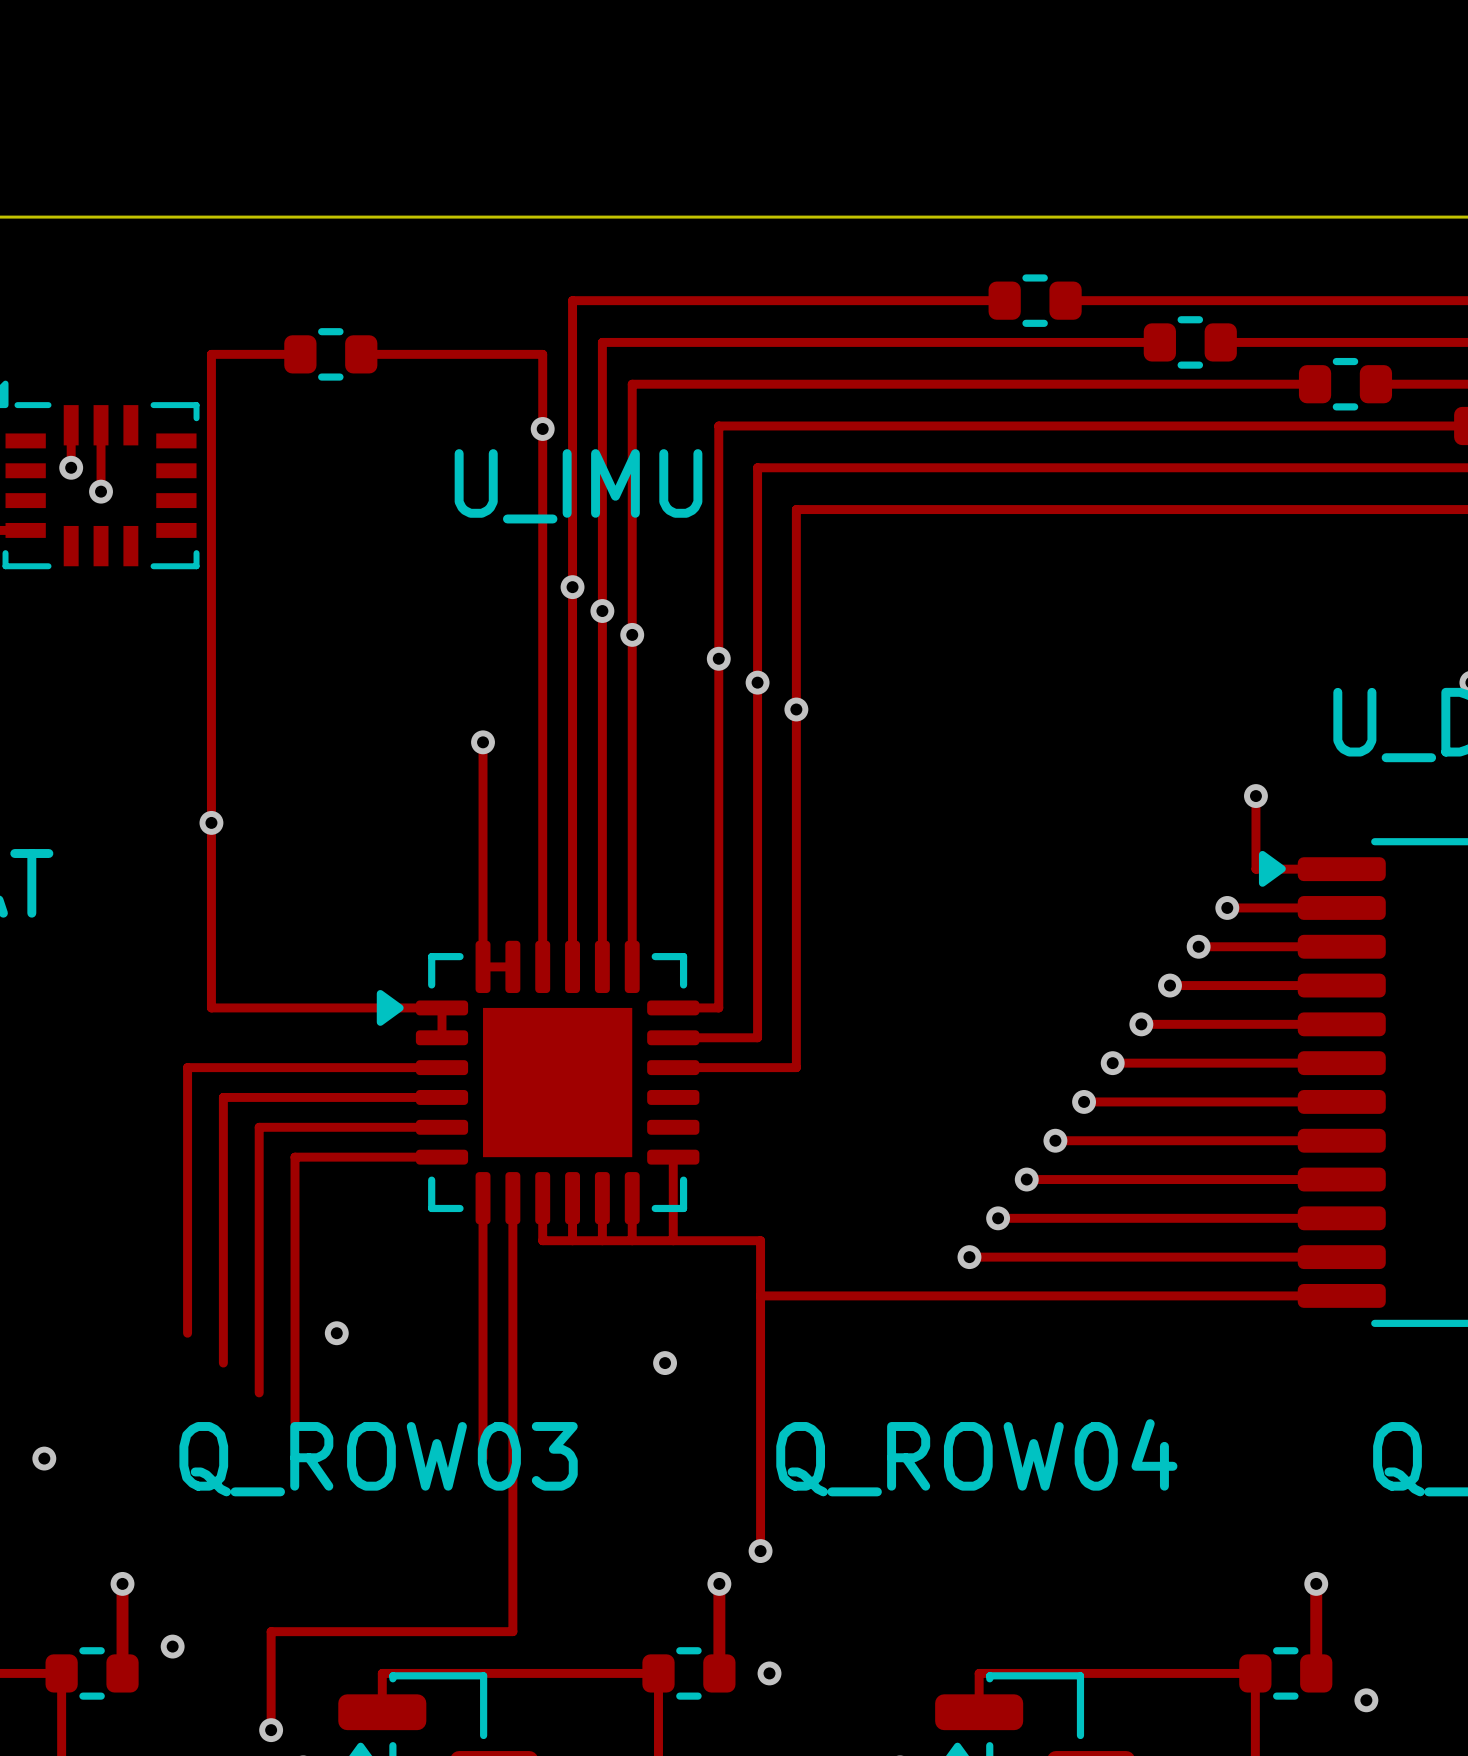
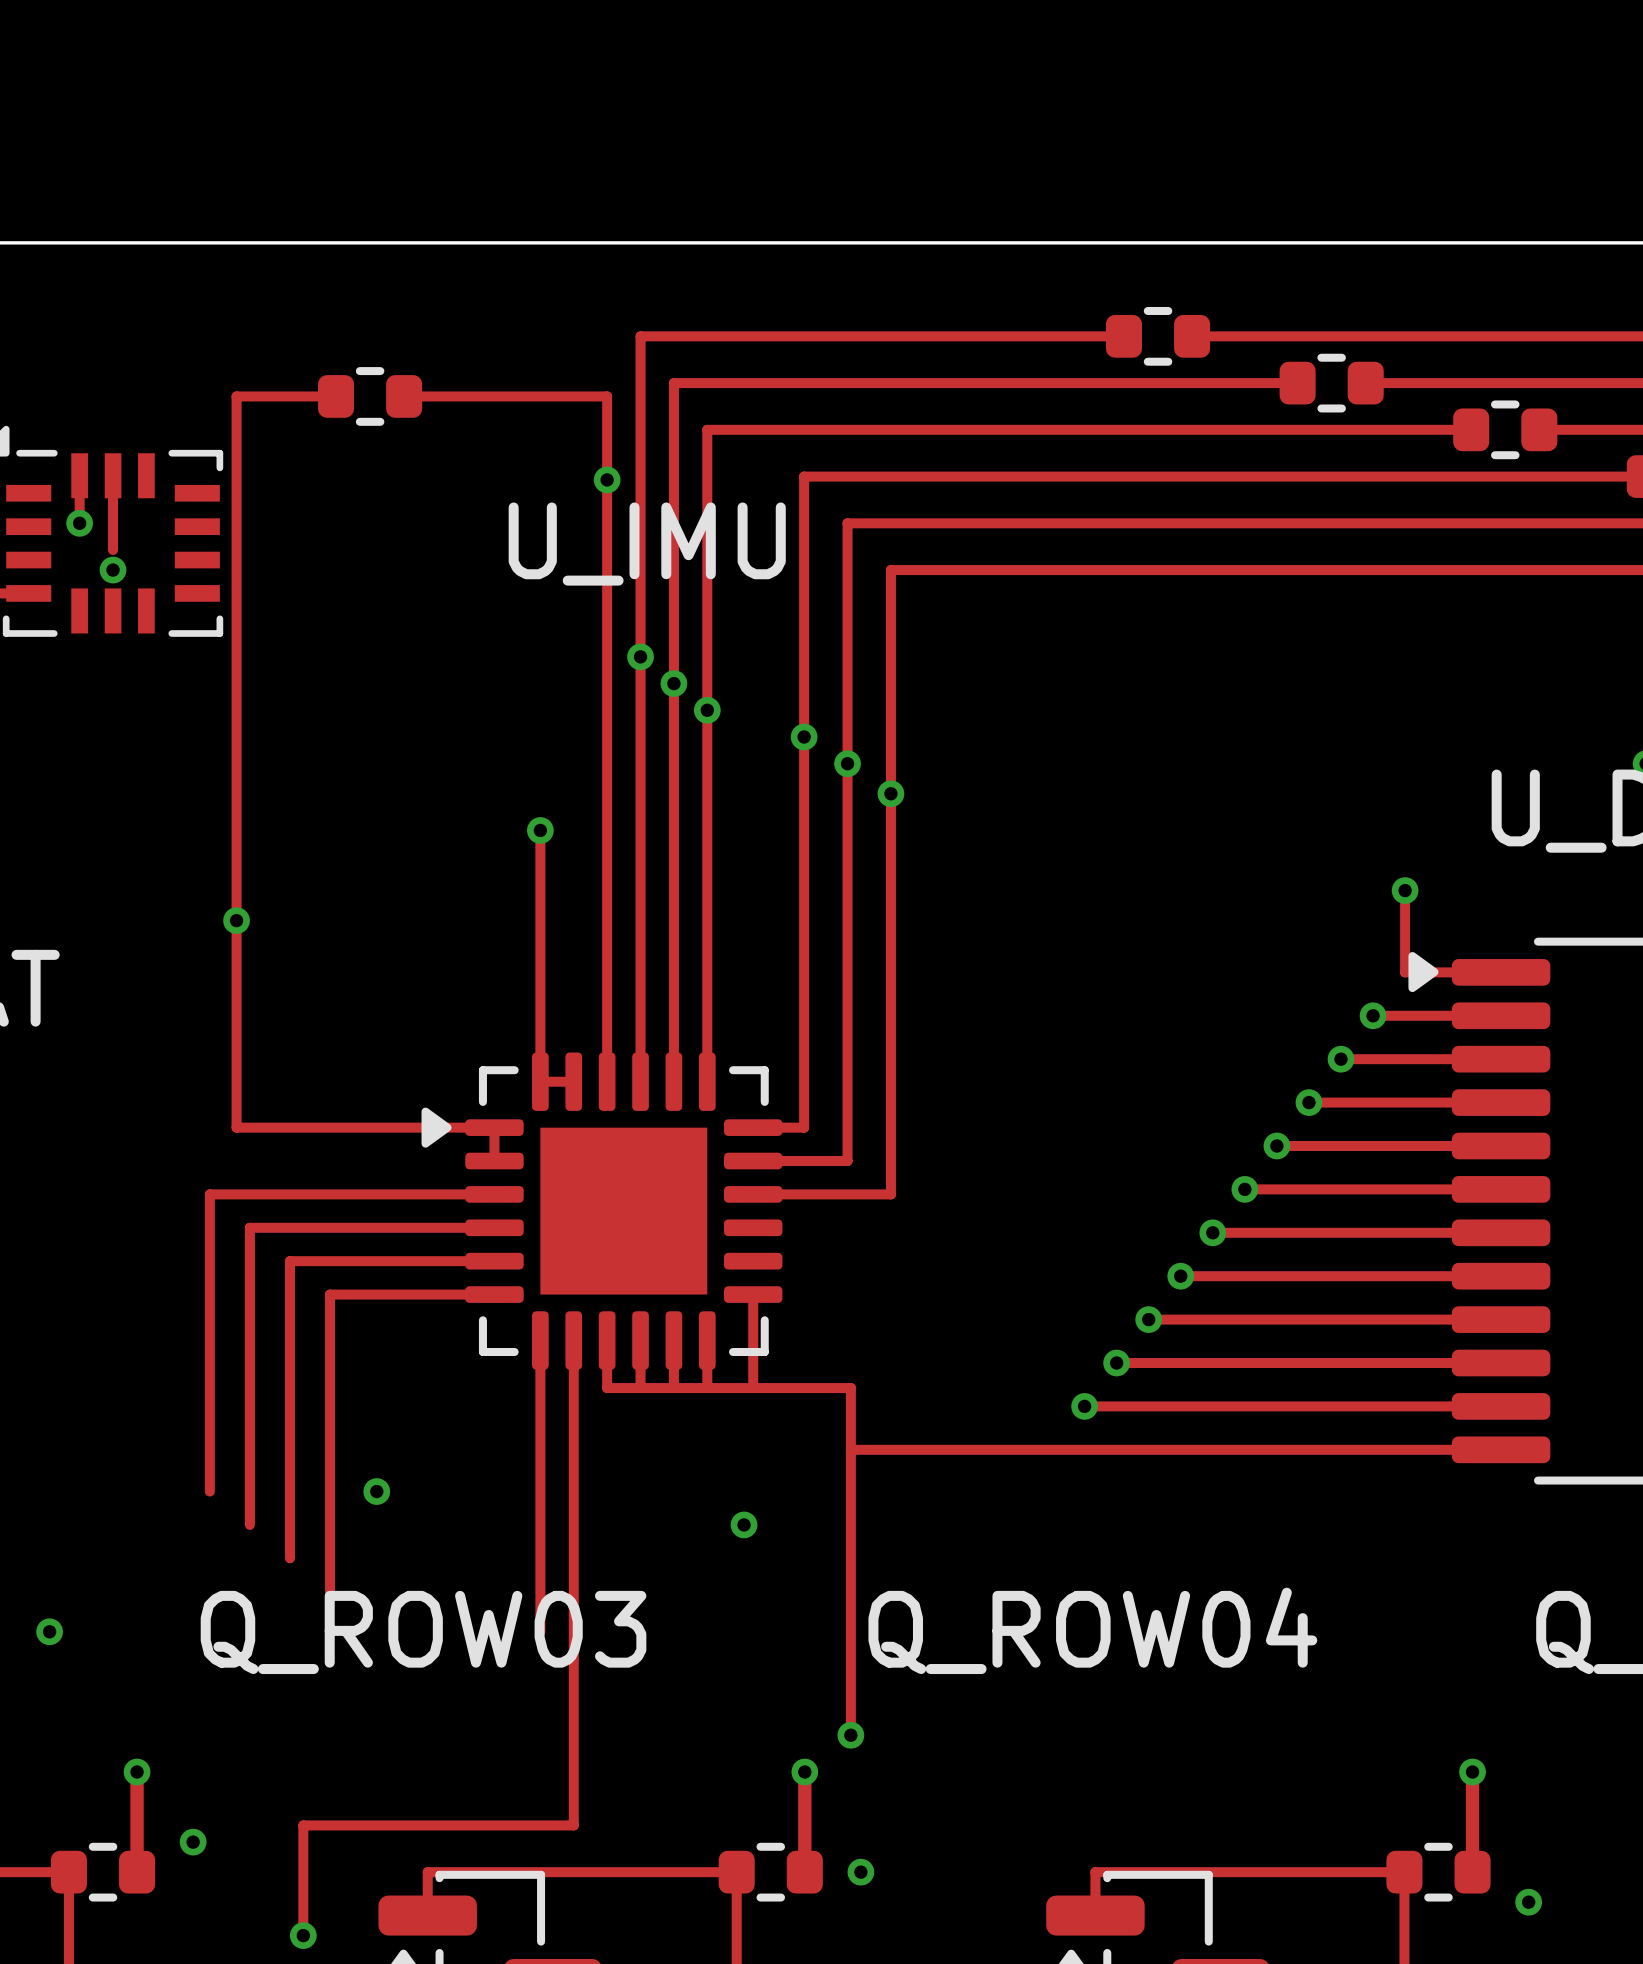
via position: (101, 491) -> (113, 570)

